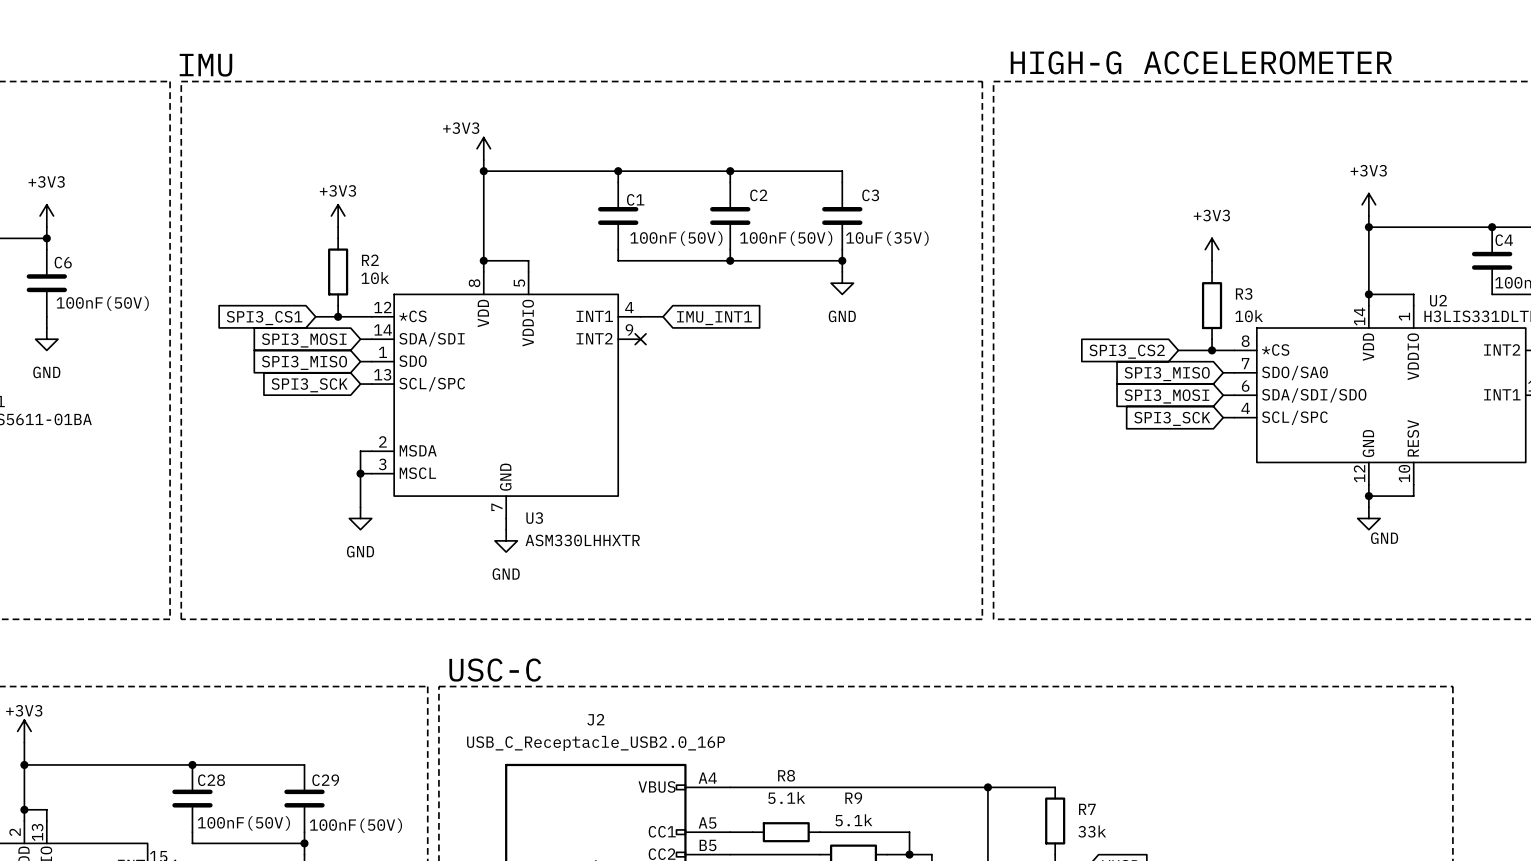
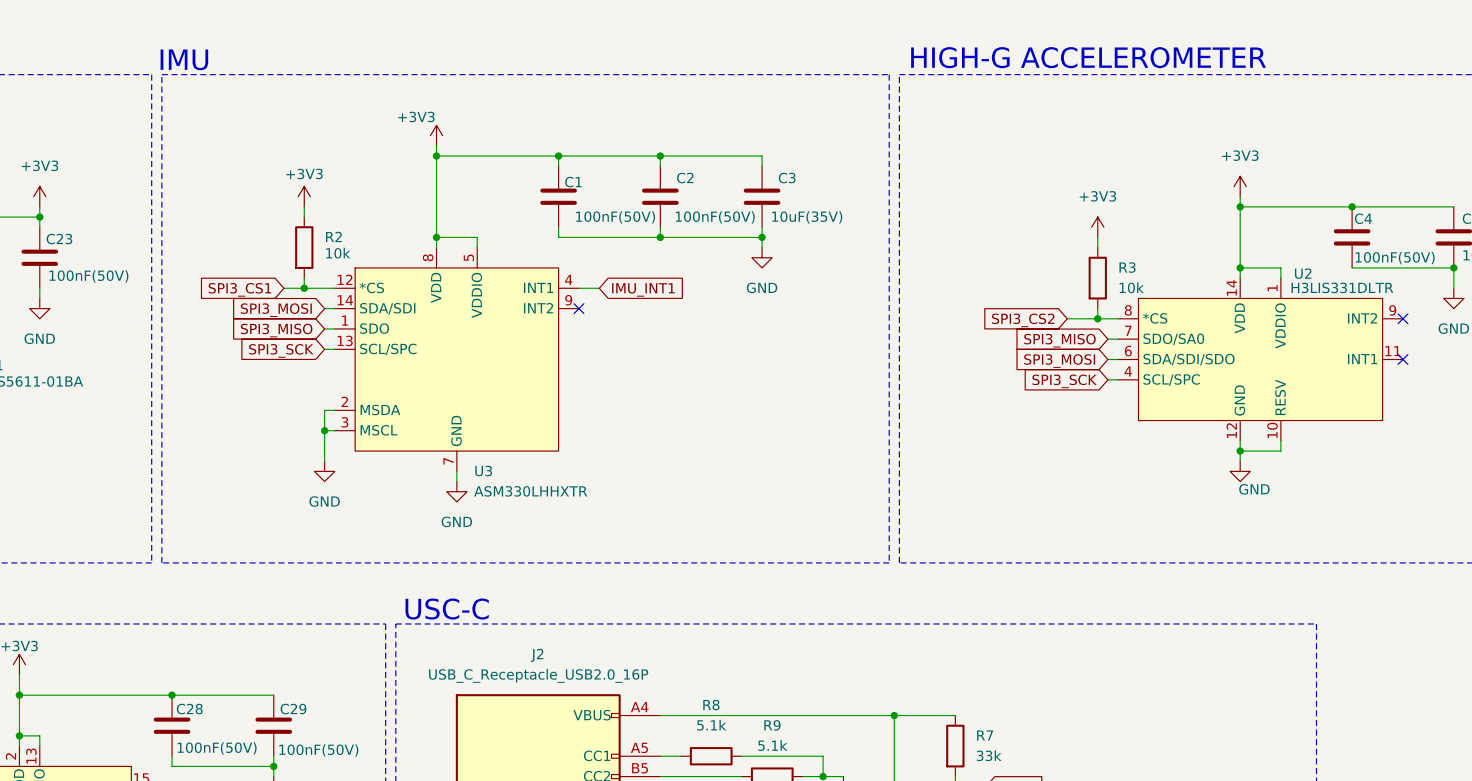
C6 name: C6 (63, 262) -> C23 (59, 239)

